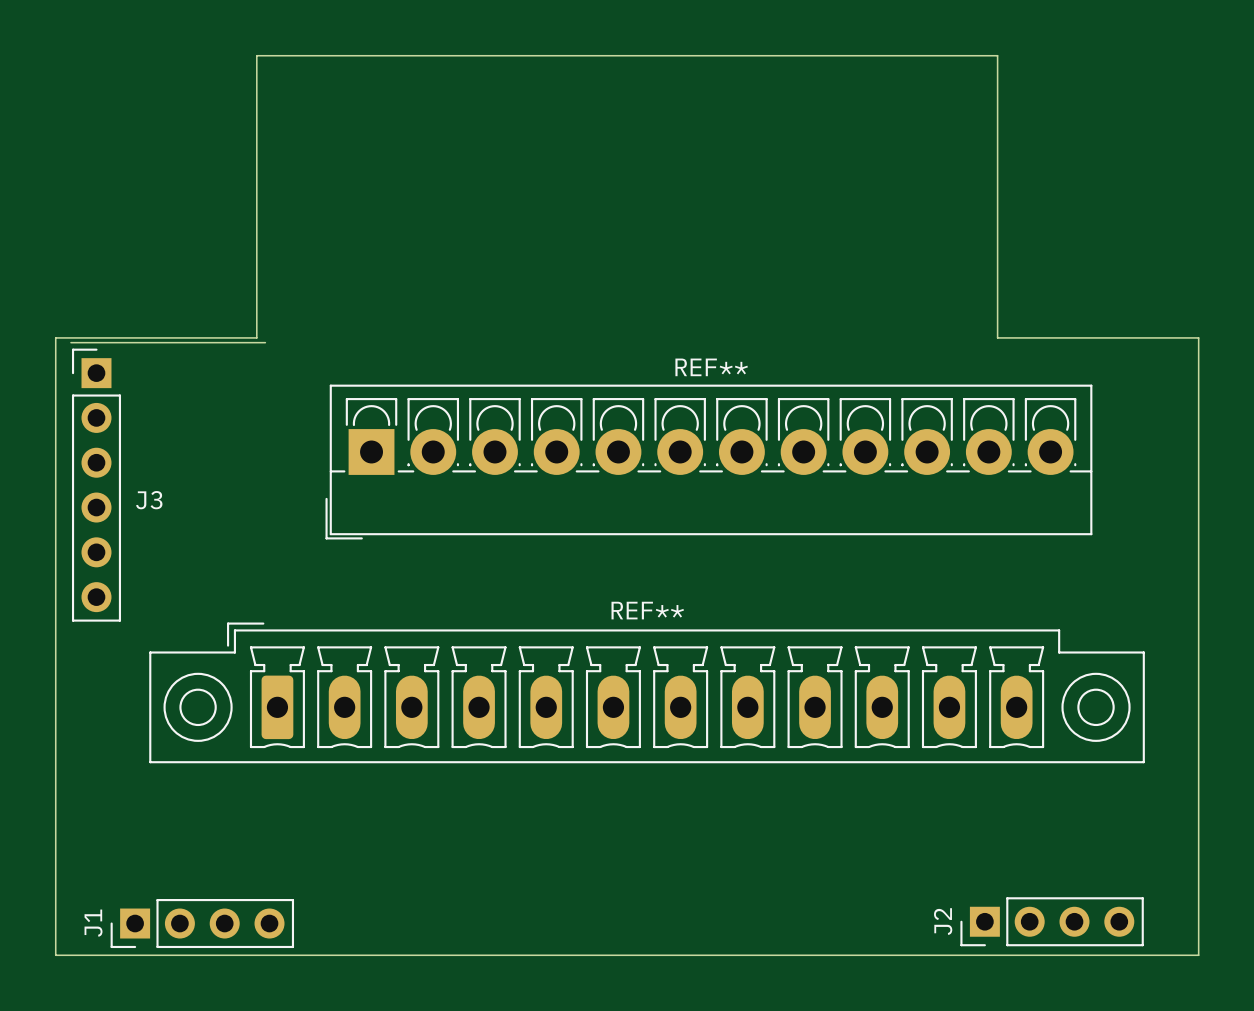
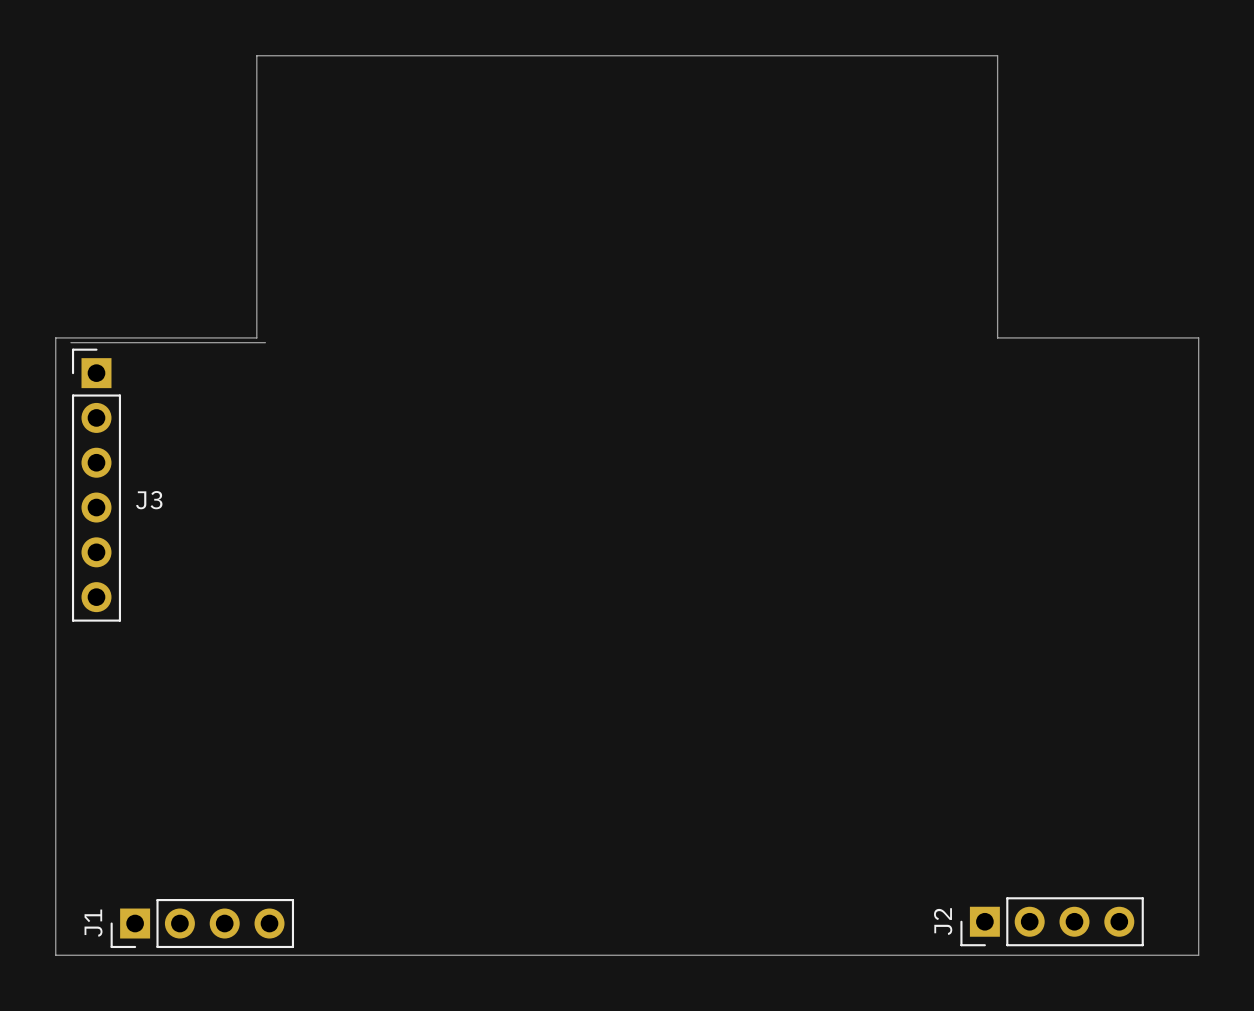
REF**: (708, 462) -> none
REF**: (647, 692) -> none

